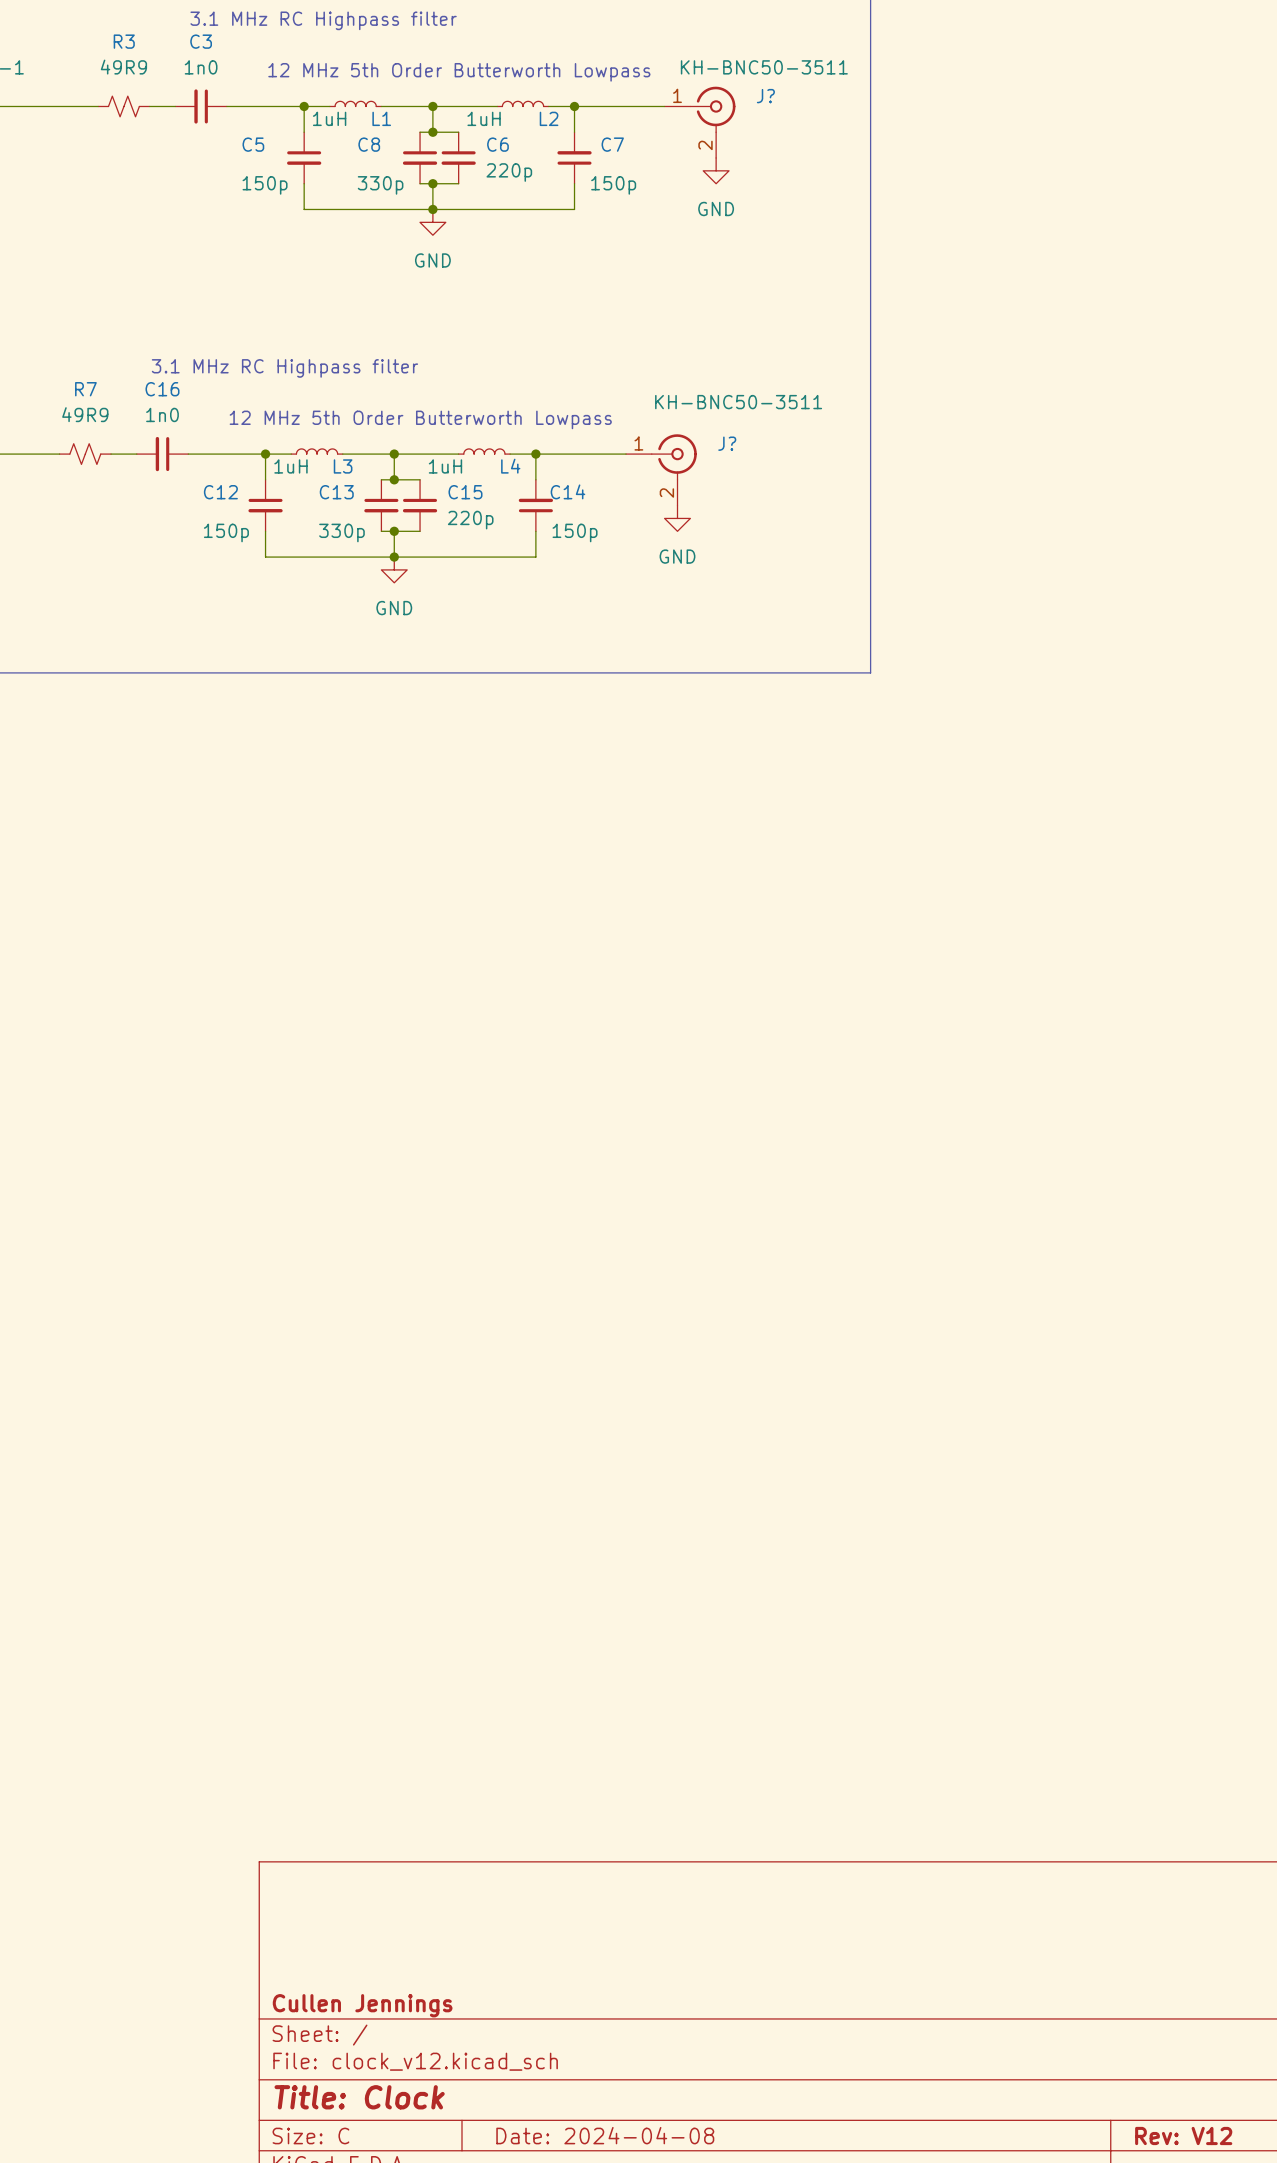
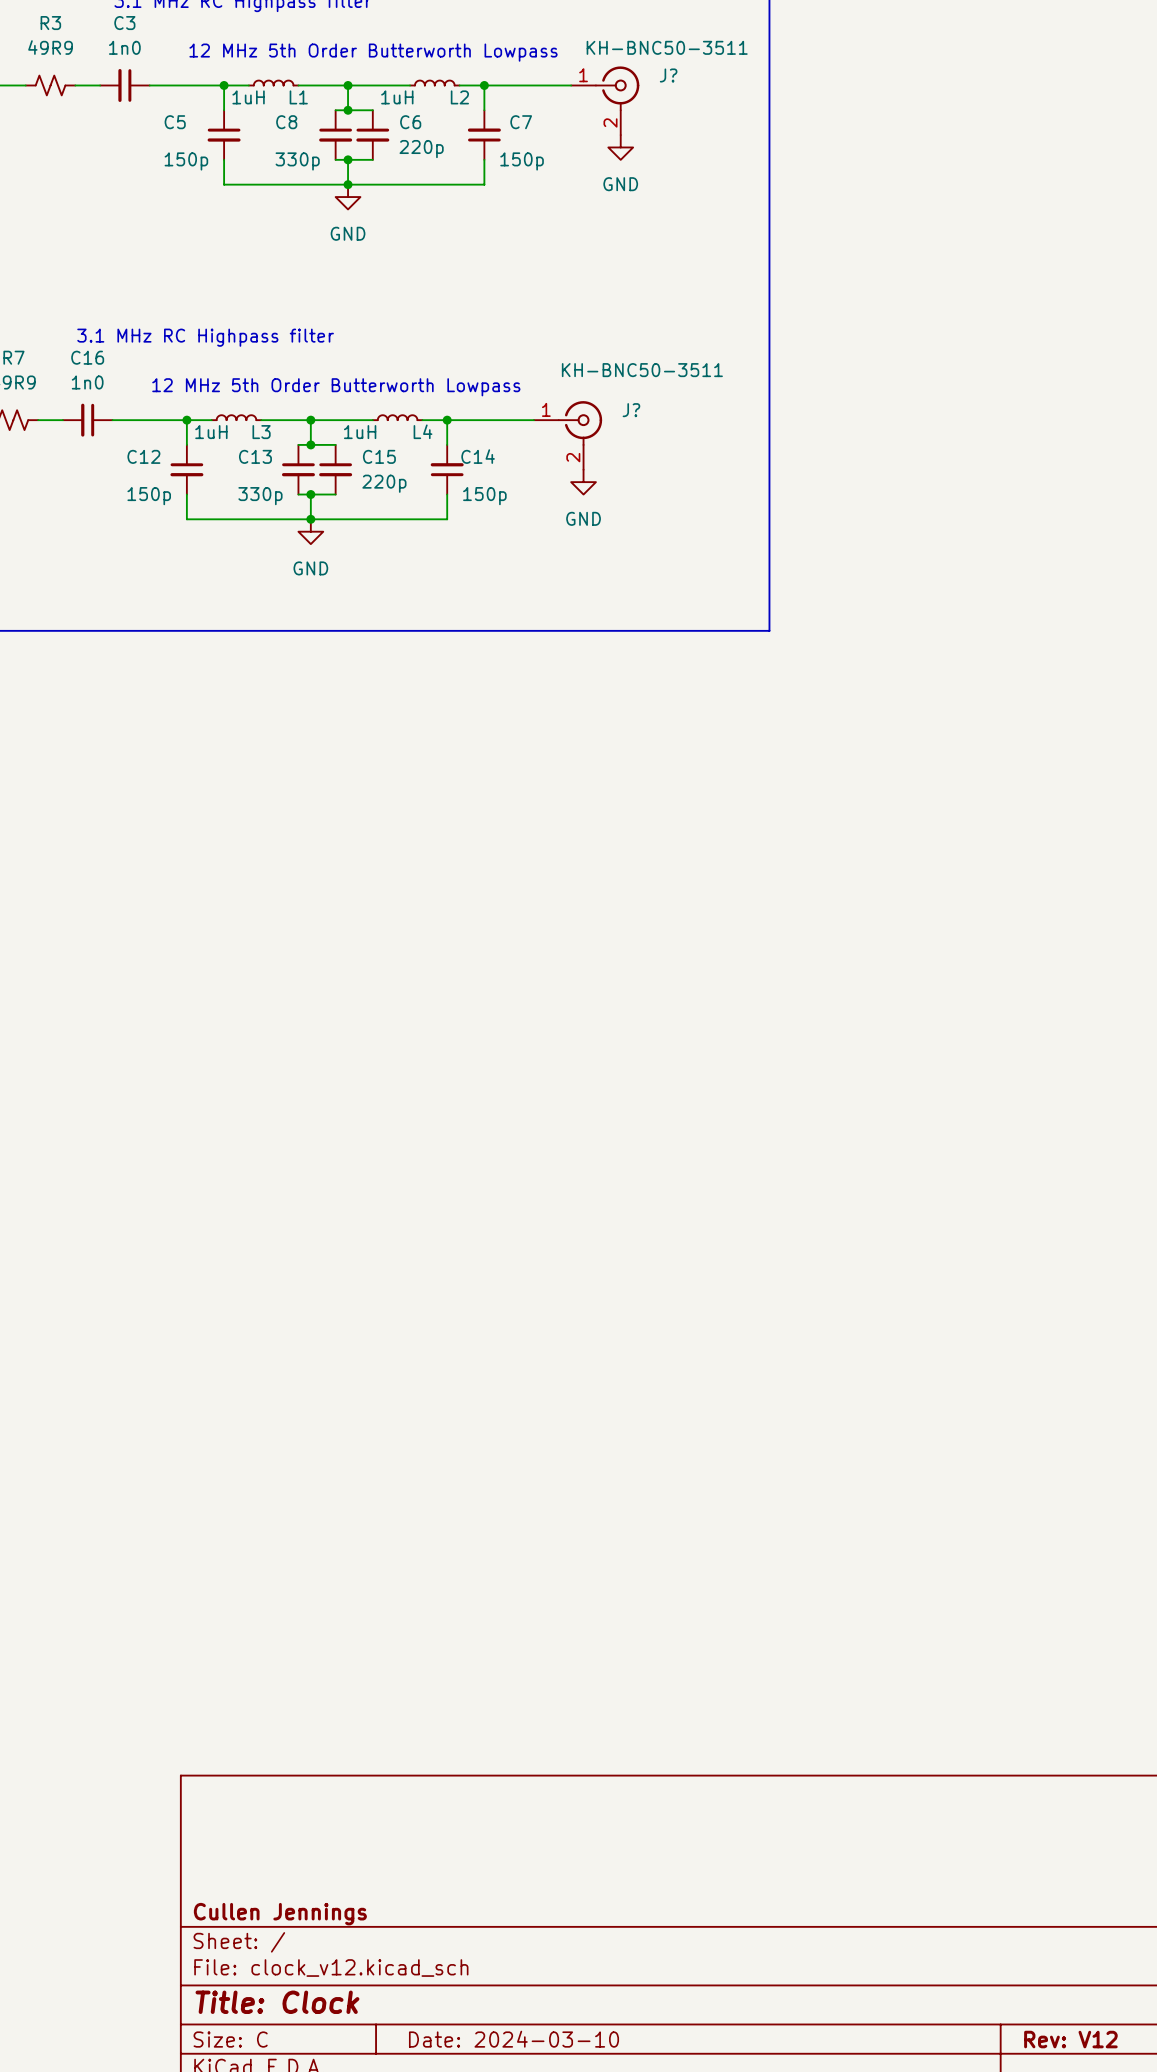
title block: Date: 2024-04-08 (605, 2135) -> Date: 2024-03-10 (514, 2039)

